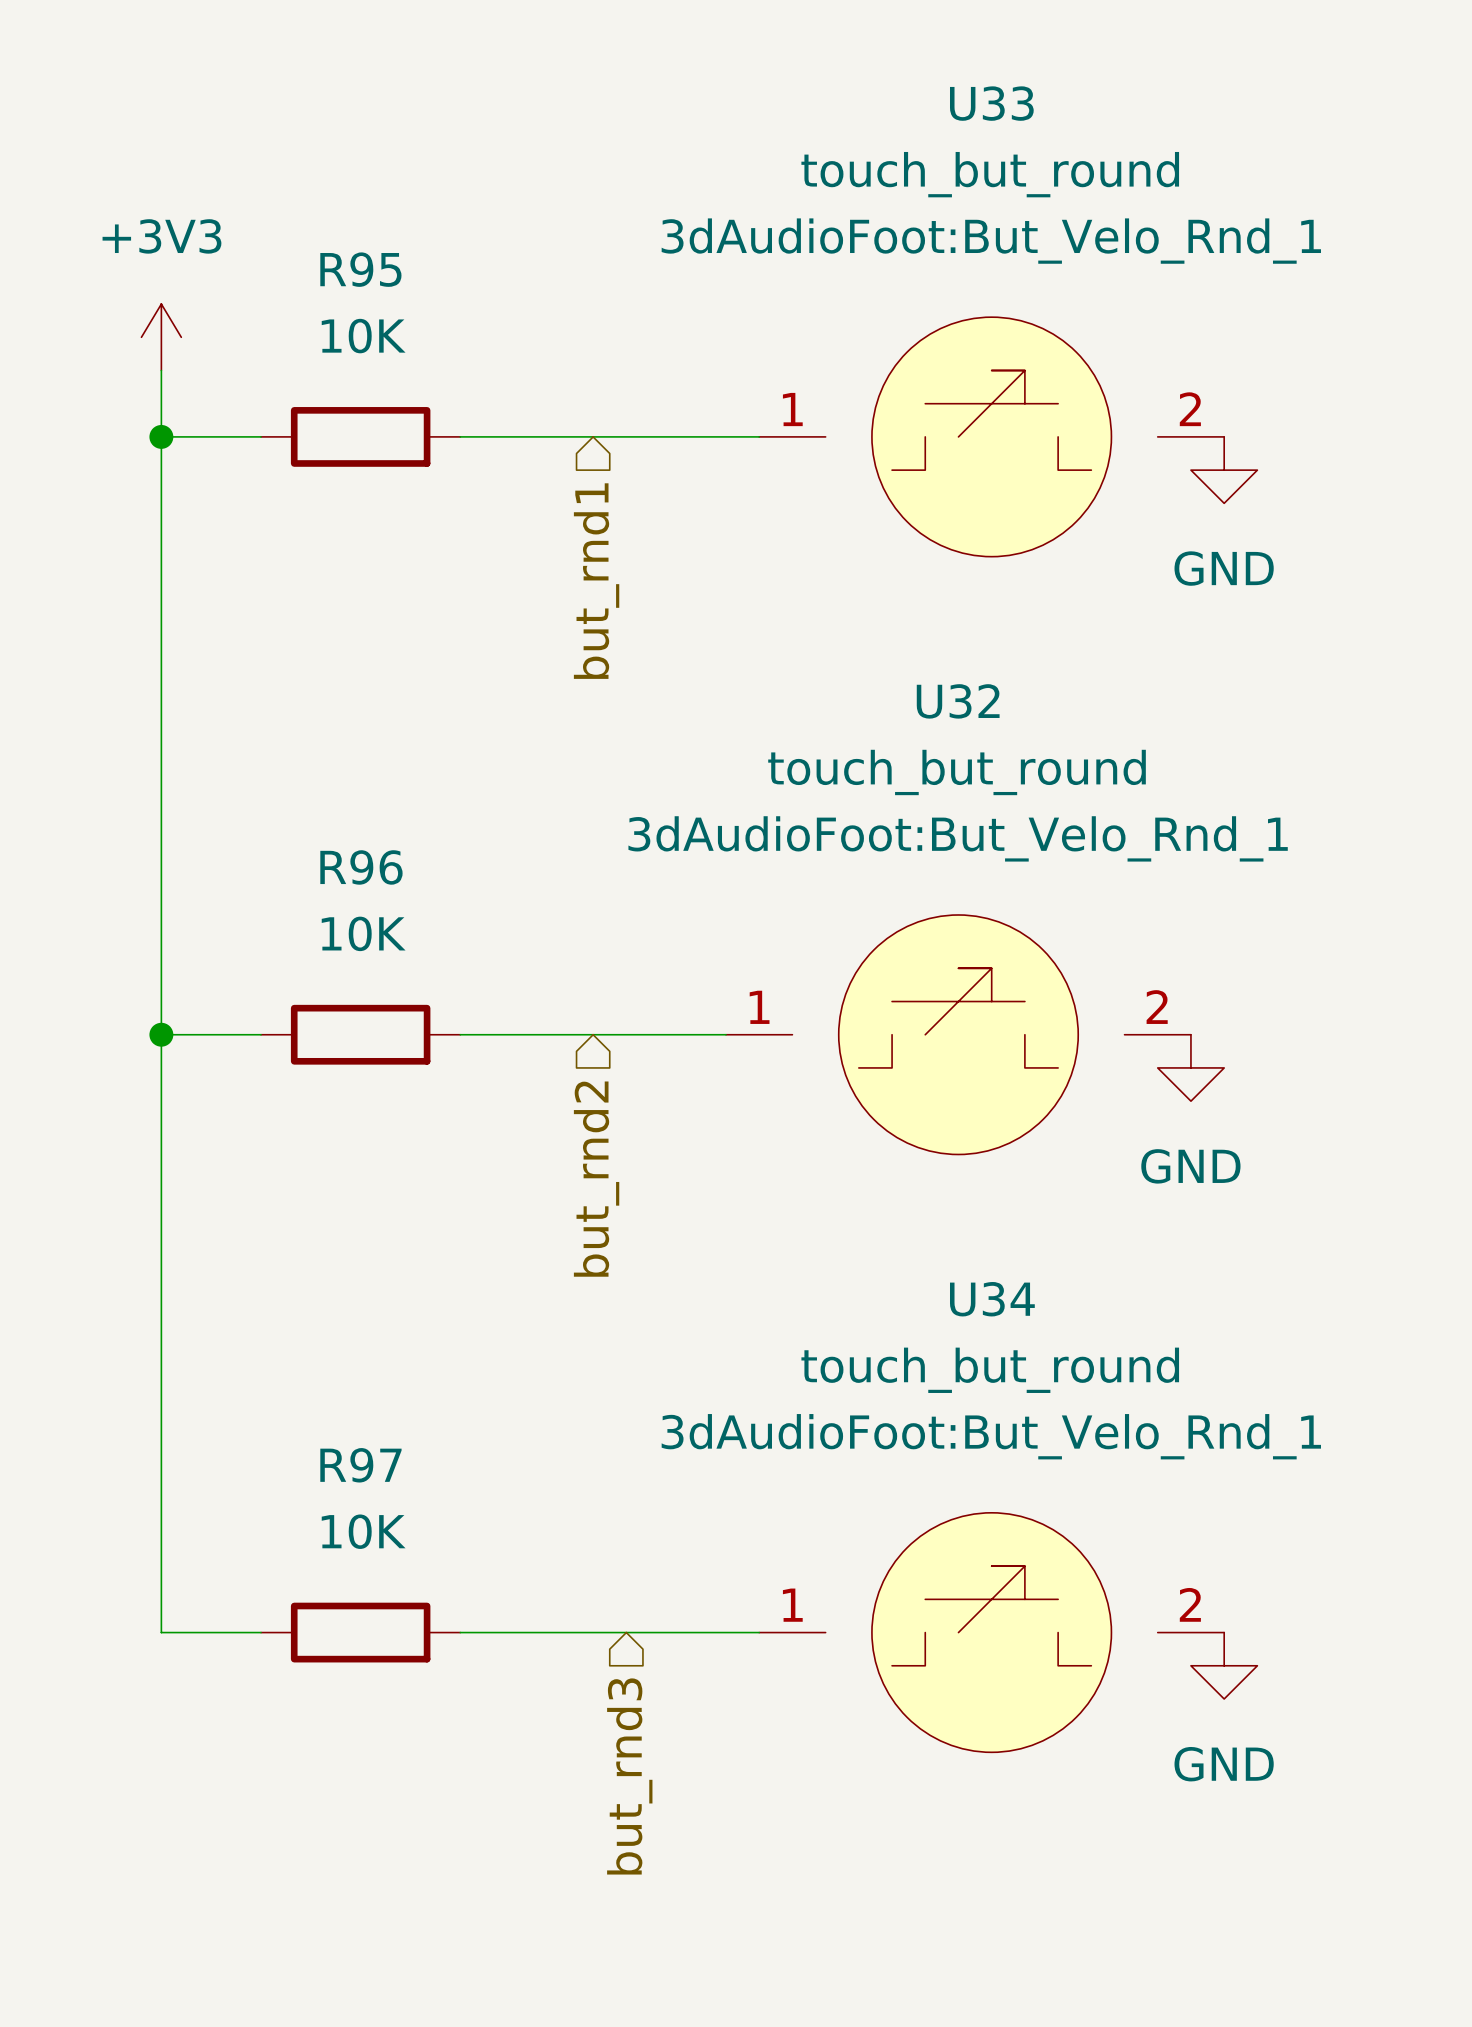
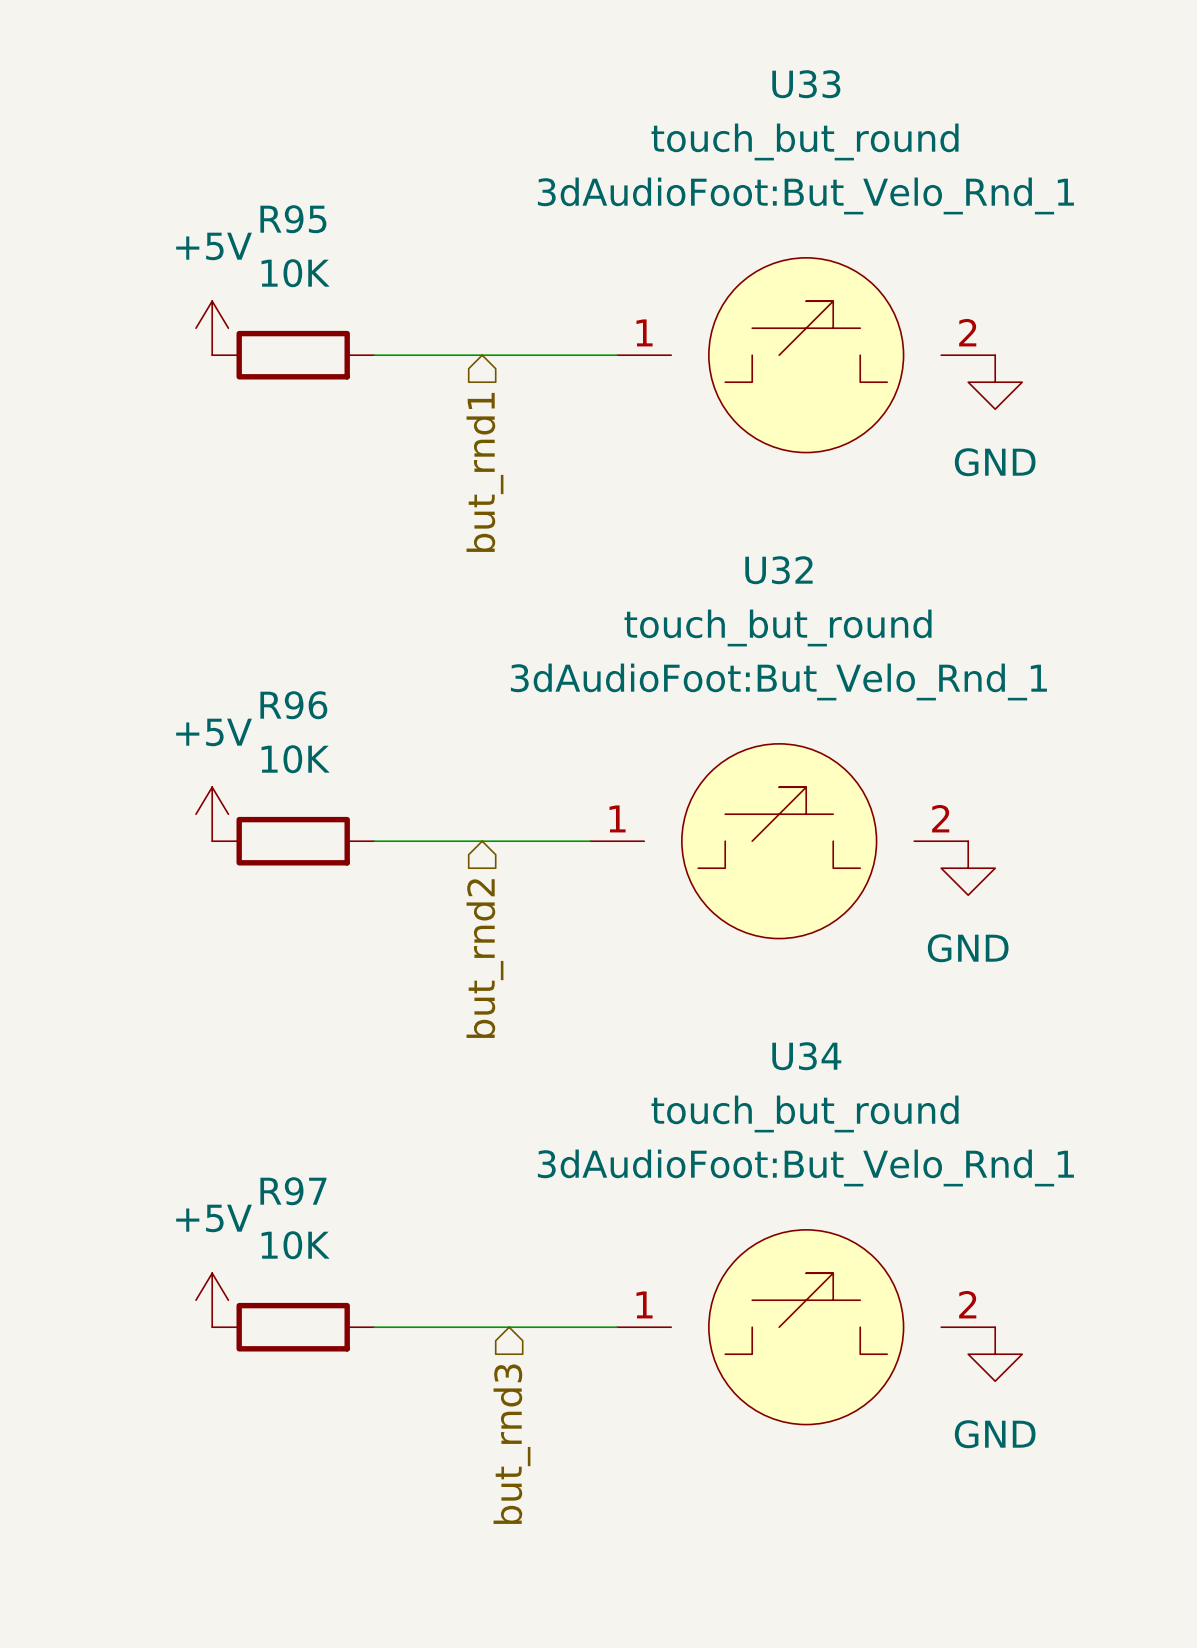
power symbol: +3V3 (161, 337) -> none
wire: (161, 370) (161, 1632) (261, 1632) -> none
power symbol: none -> +5V (212, 328)
wire: (161, 436) (261, 436) -> none
junction: (161, 436) -> none
power symbol: none -> +5V (212, 814)
wire: (161, 1034) (261, 1034) -> none
junction: (161, 1034) -> none
power symbol: none -> +5V (212, 1300)

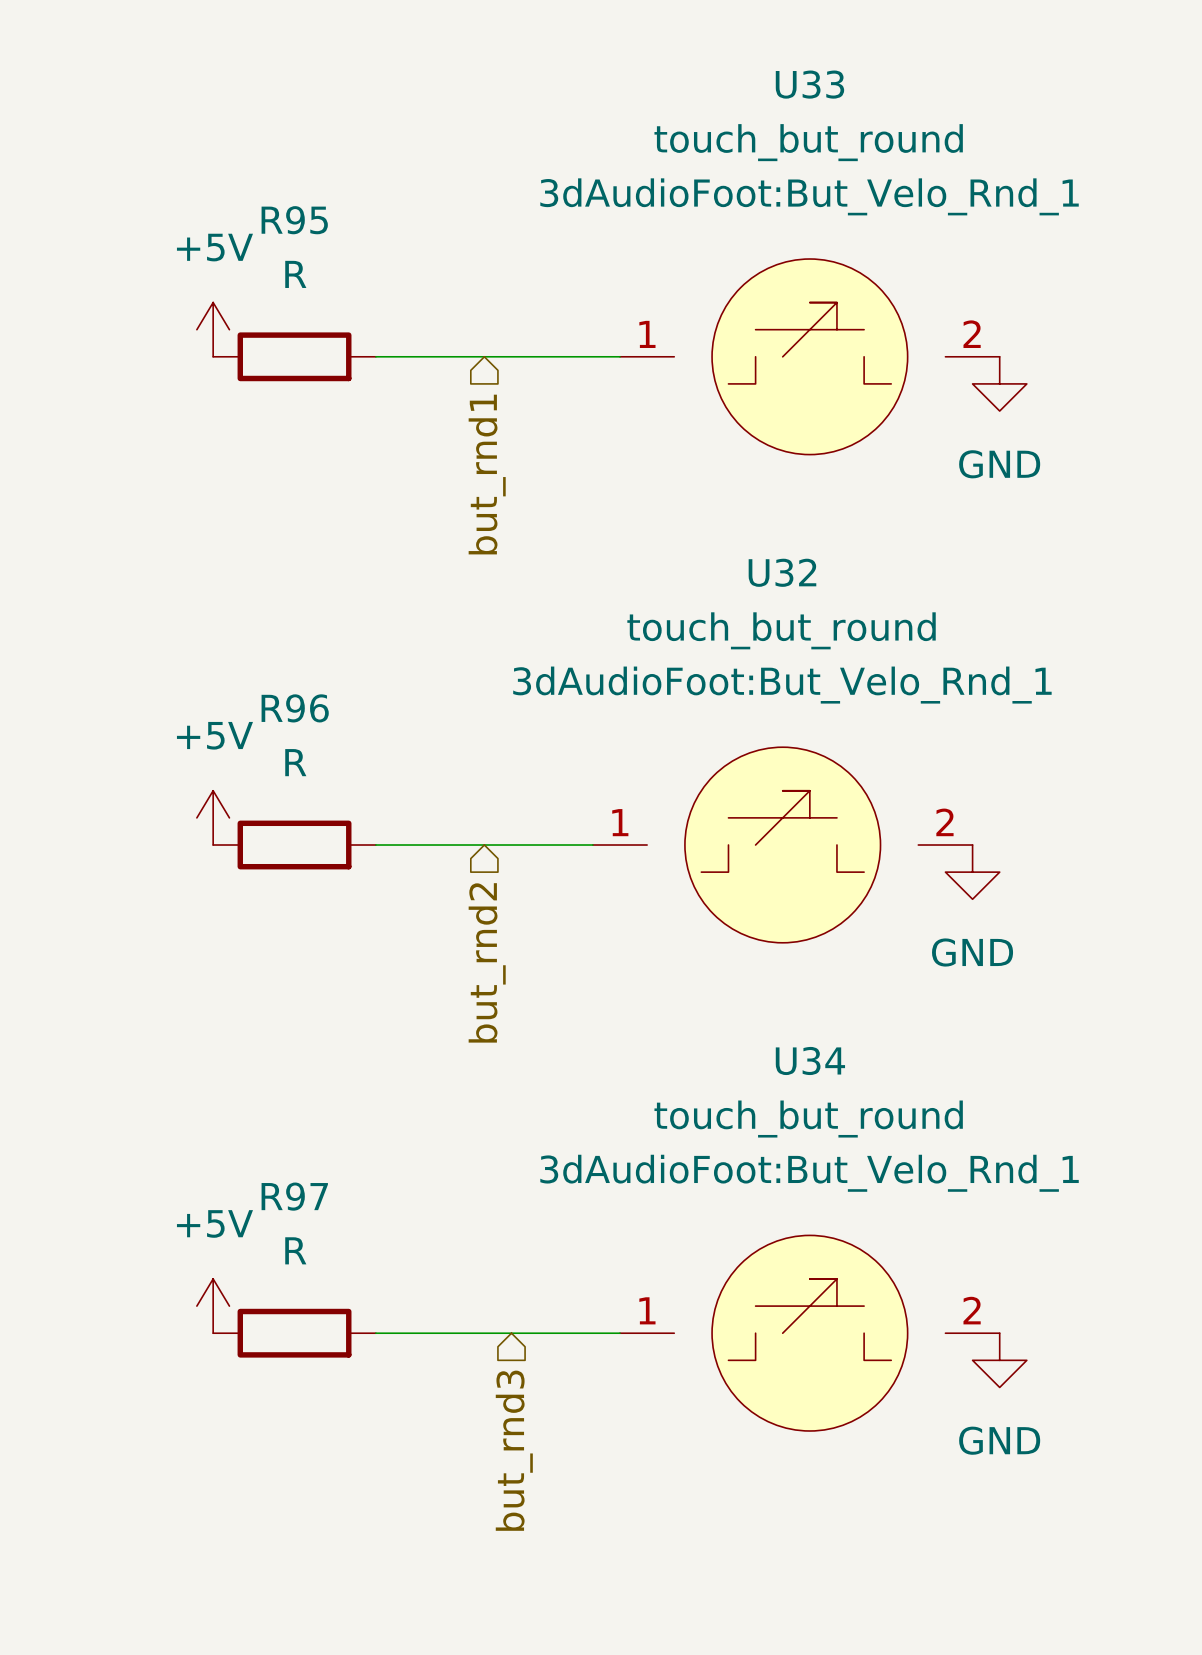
R95 value: 10K (295, 273) -> R (295, 274)
R96 value: 10K (295, 759) -> R (295, 762)
R97 value: 10K (295, 1245) -> R (295, 1250)

